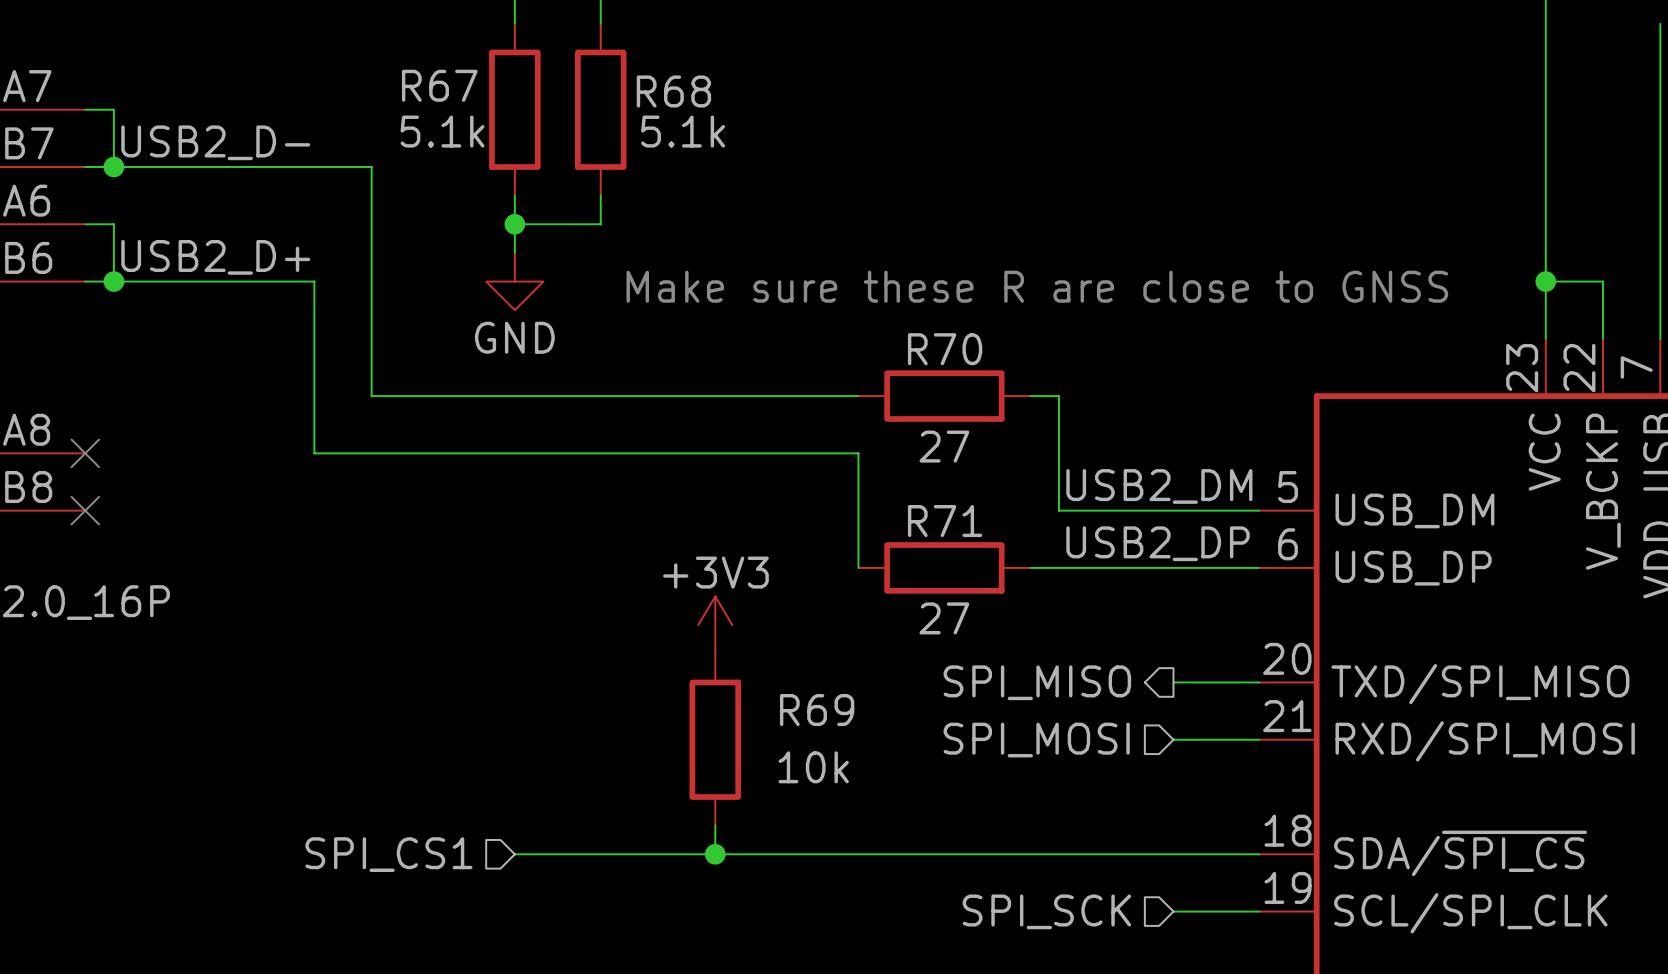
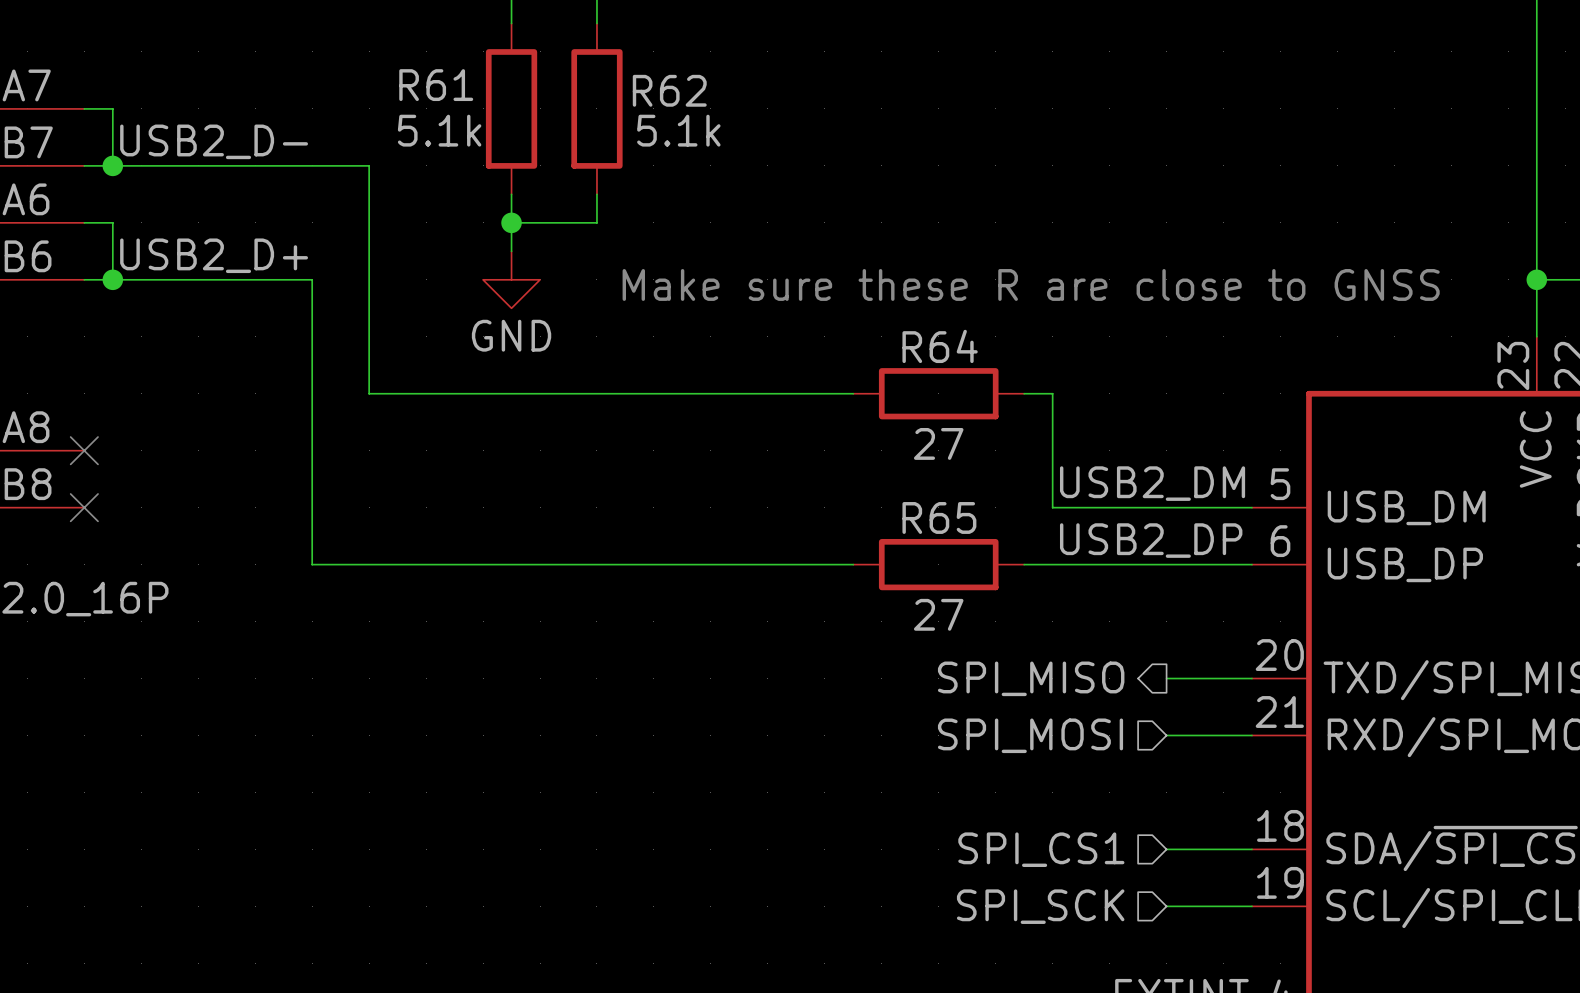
R67 name: R67 (439, 85) -> R61 (436, 85)
R68 name: R68 (673, 91) -> R62 (669, 90)
R70 name: R70 (945, 349) -> R64 (940, 346)
wire: (314, 453) (858, 453) (858, 567) -> (312, 450) (312, 564) (853, 564)
R71 name: R71 (945, 521) -> R65 (939, 517)
power symbol: +3V3 (715, 625) -> none
R69: 10k (715, 739) -> none
wire: (715, 825) (715, 854) -> none
hierarchical label: SPI_CS1 (388, 854) -> none
wire: (514, 854) (1173, 854) -> none
junction: (715, 854) -> none
hierarchical label: none -> SPI_CS1 (1041, 849)

